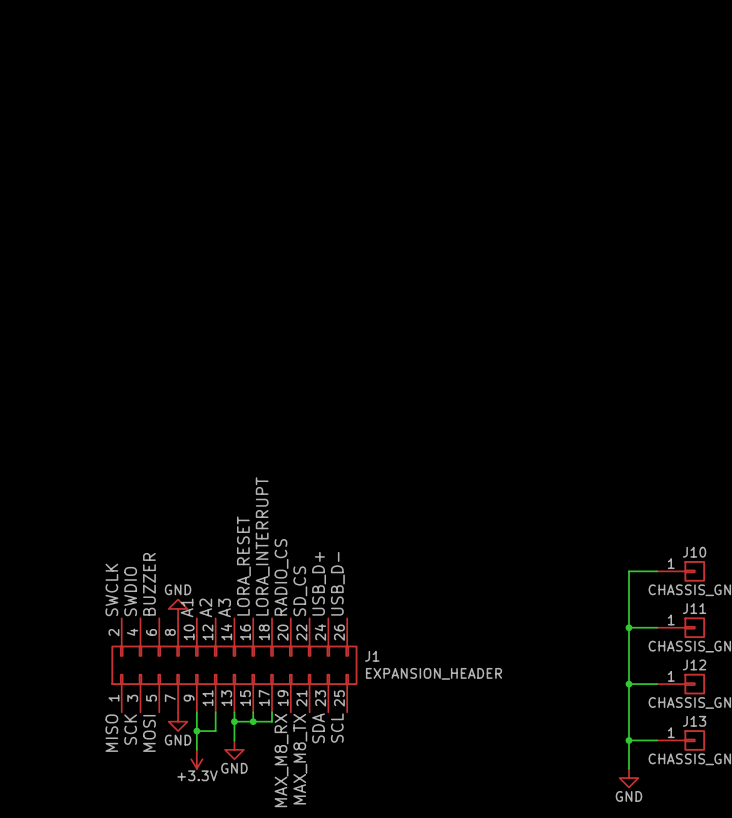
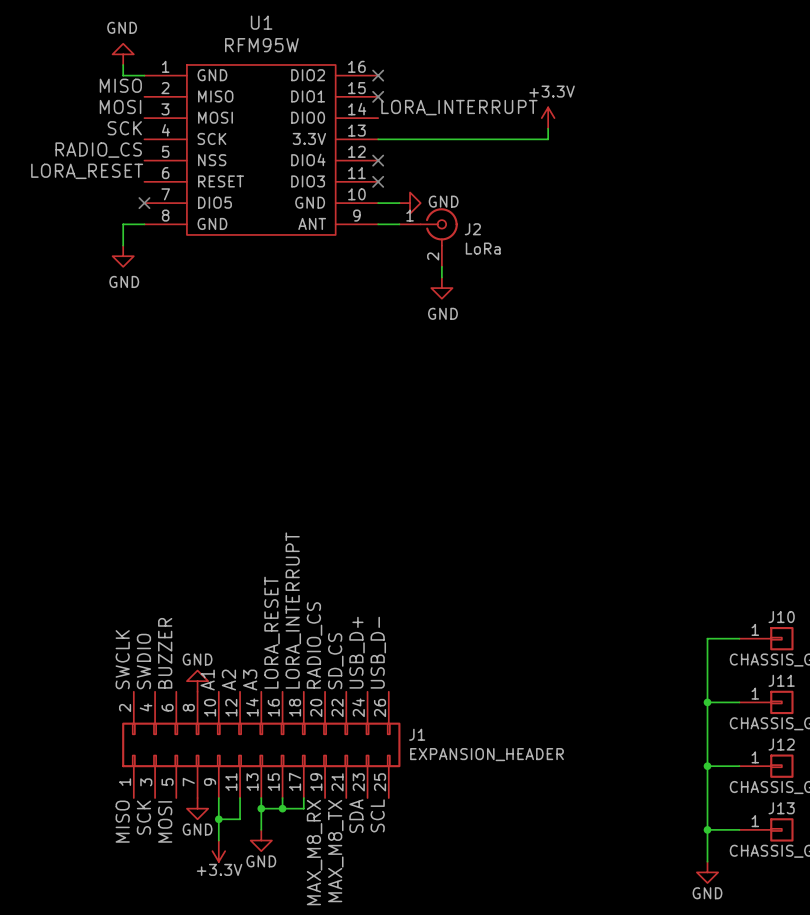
power symbol: none -> GND (123, 54)
wire: none -> (123, 64) (123, 75) (144, 75)
no-connect mark: none -> (378, 75)
label: none -> MISO (120, 85)
no-connect mark: none -> (378, 96)
label: none -> MOSI (120, 106)
label: none -> LORA_INTERRUPT (459, 107)
power symbol: none -> +3.3V (548, 118)
label: none -> SCK (124, 128)
wire: none -> (548, 128) (548, 139) (378, 139)
label: none -> RADIO_CS (98, 150)
U1: none -> RFM95W (261, 149)
no-connect mark: none -> (378, 160)
label: none -> LORA_RESET (87, 171)
no-connect mark: none -> (378, 181)
no-connect mark: none -> (144, 203)
wire: none -> (378, 203) (399, 203)
power symbol: none -> GND (410, 203)
wire: none -> (144, 224) (123, 224) (123, 245)
wire: none -> (378, 224) (399, 224)
J2: none -> LoRa (428, 237)
power symbol: none -> GND (123, 256)
wire: none -> (441, 266) (441, 277)
power symbol: none -> GND (441, 288)

